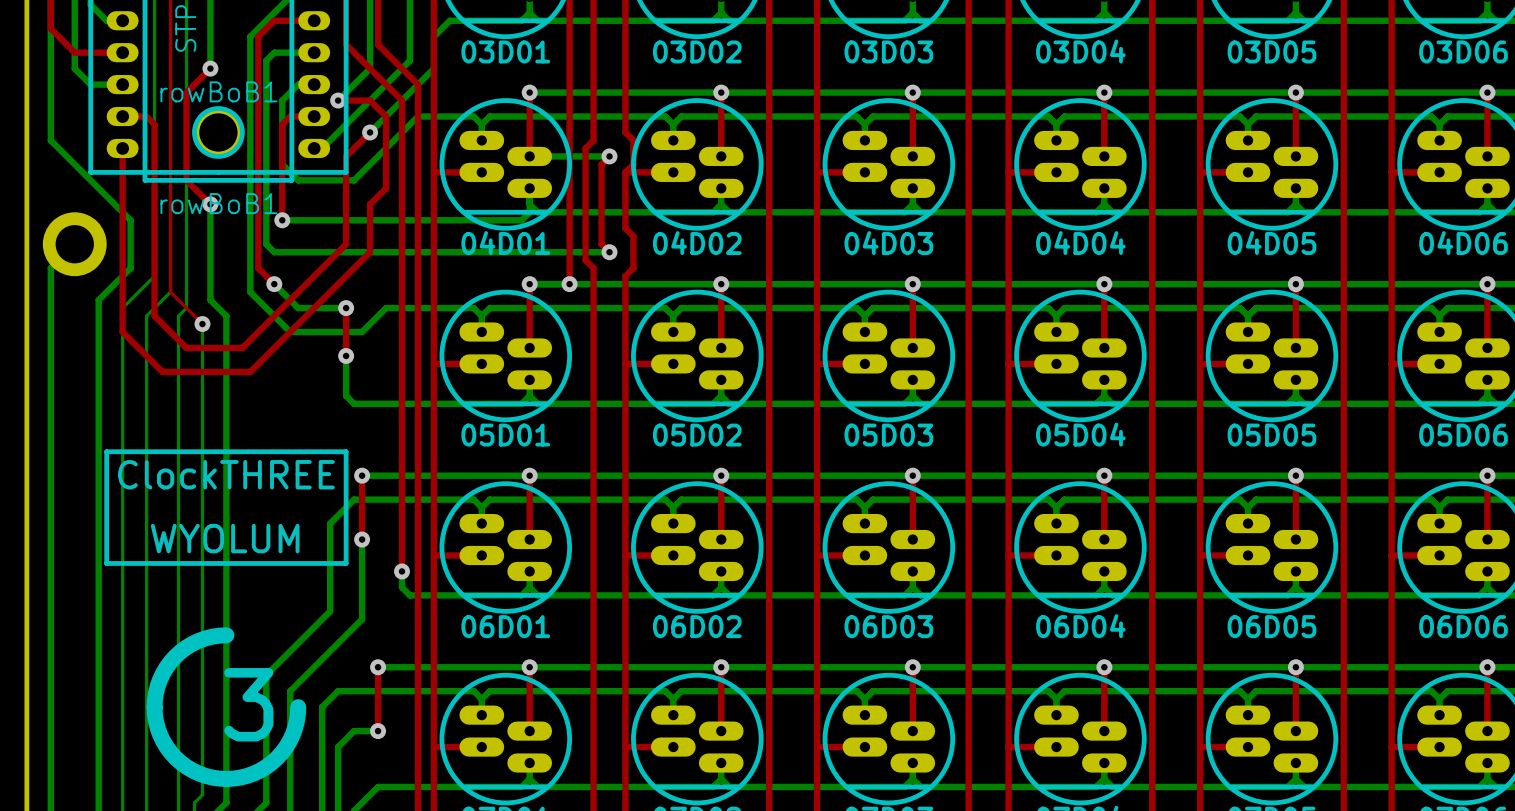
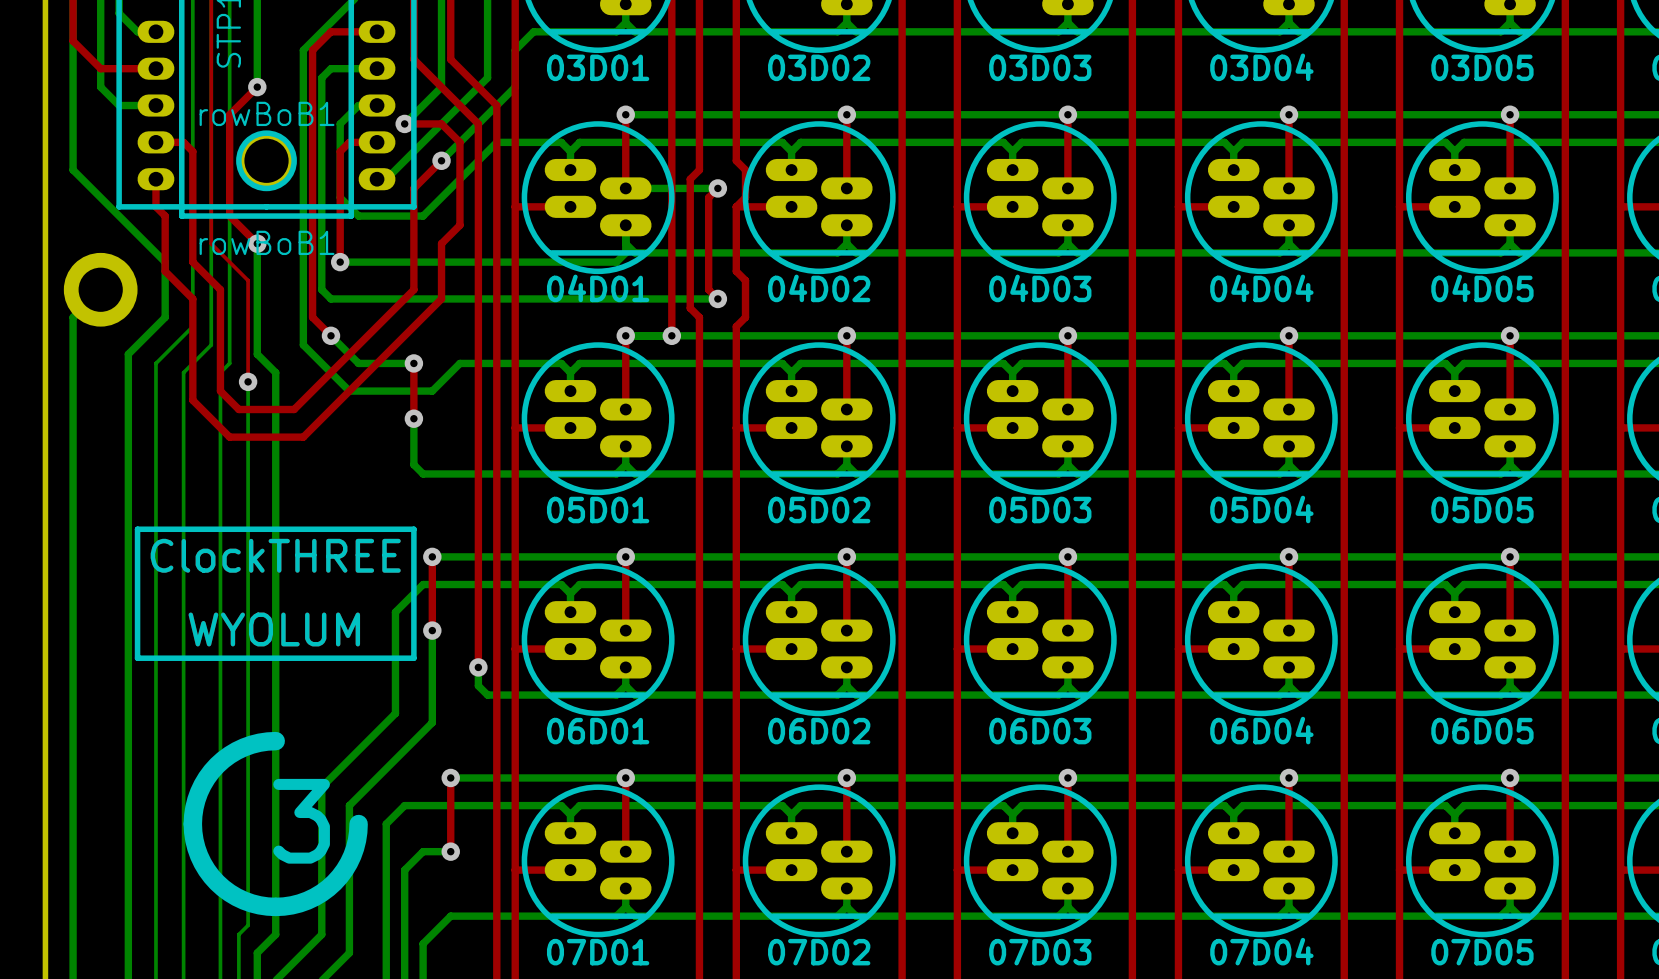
top track: (122, 172) (122, 332) (162, 371) (186, 371) -> none
top track: (170, 204) (170, 292) (202, 324) -> (211, 243) (248, 280) (248, 381)
top track: (154, 220) (154, 252) -> (155, 206) (165, 216) (165, 271) (192, 298)
top track: none -> (192, 262) (220, 289) (220, 391) (238, 409)
top track: (154, 316) (186, 347) (194, 347) -> (192, 372) (192, 400) (229, 437)

